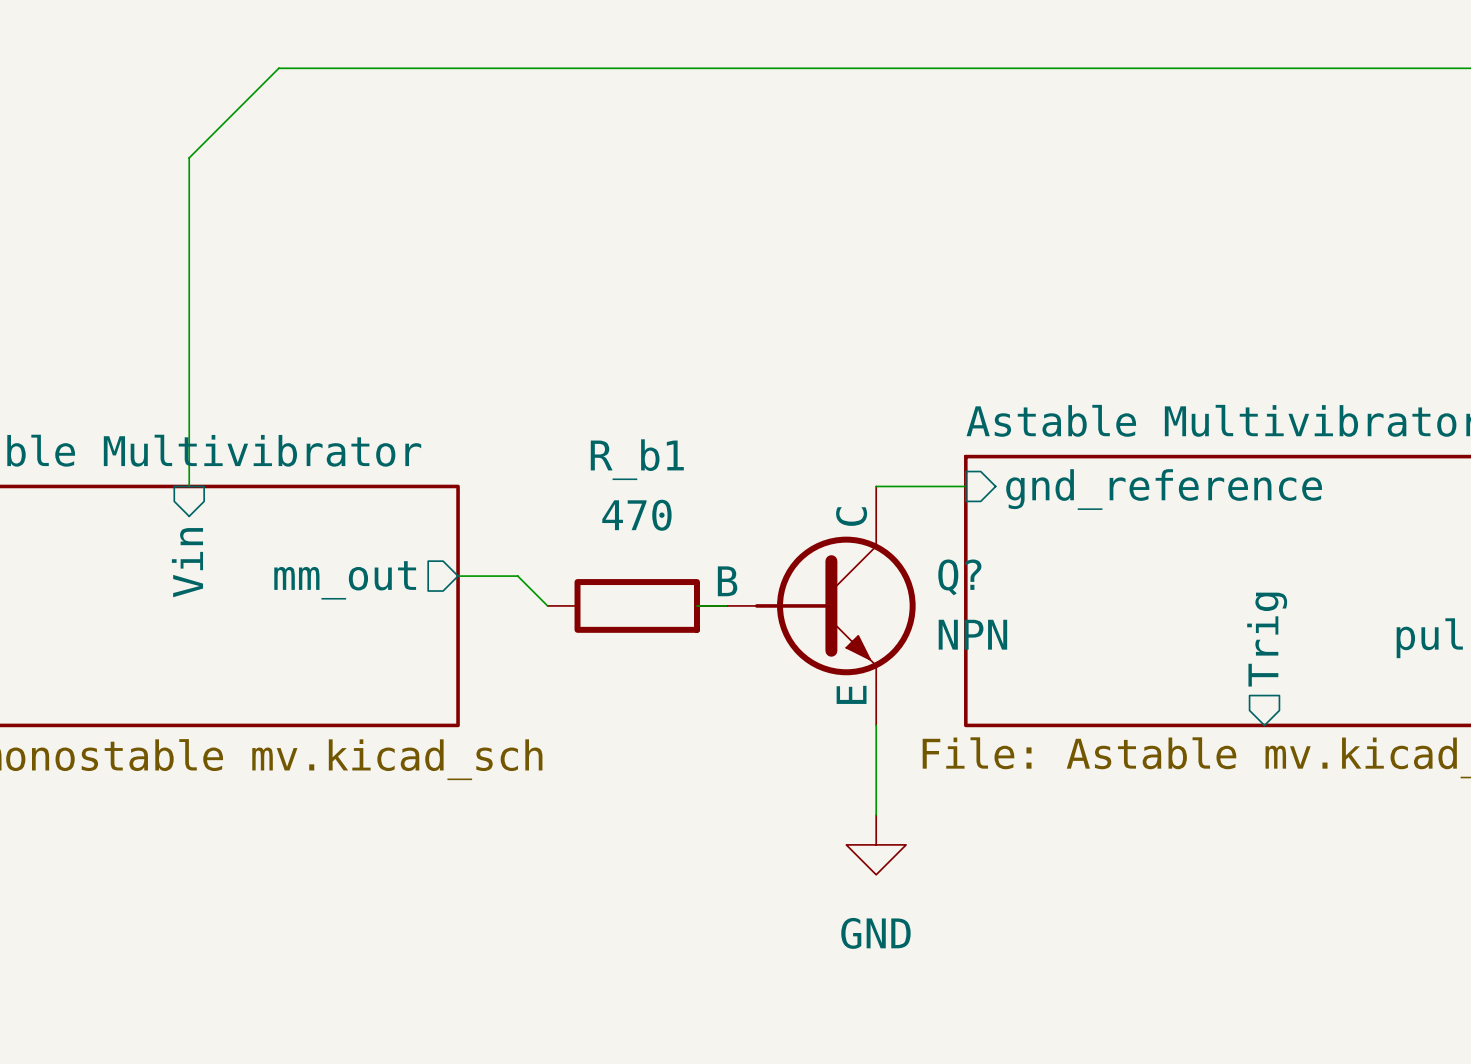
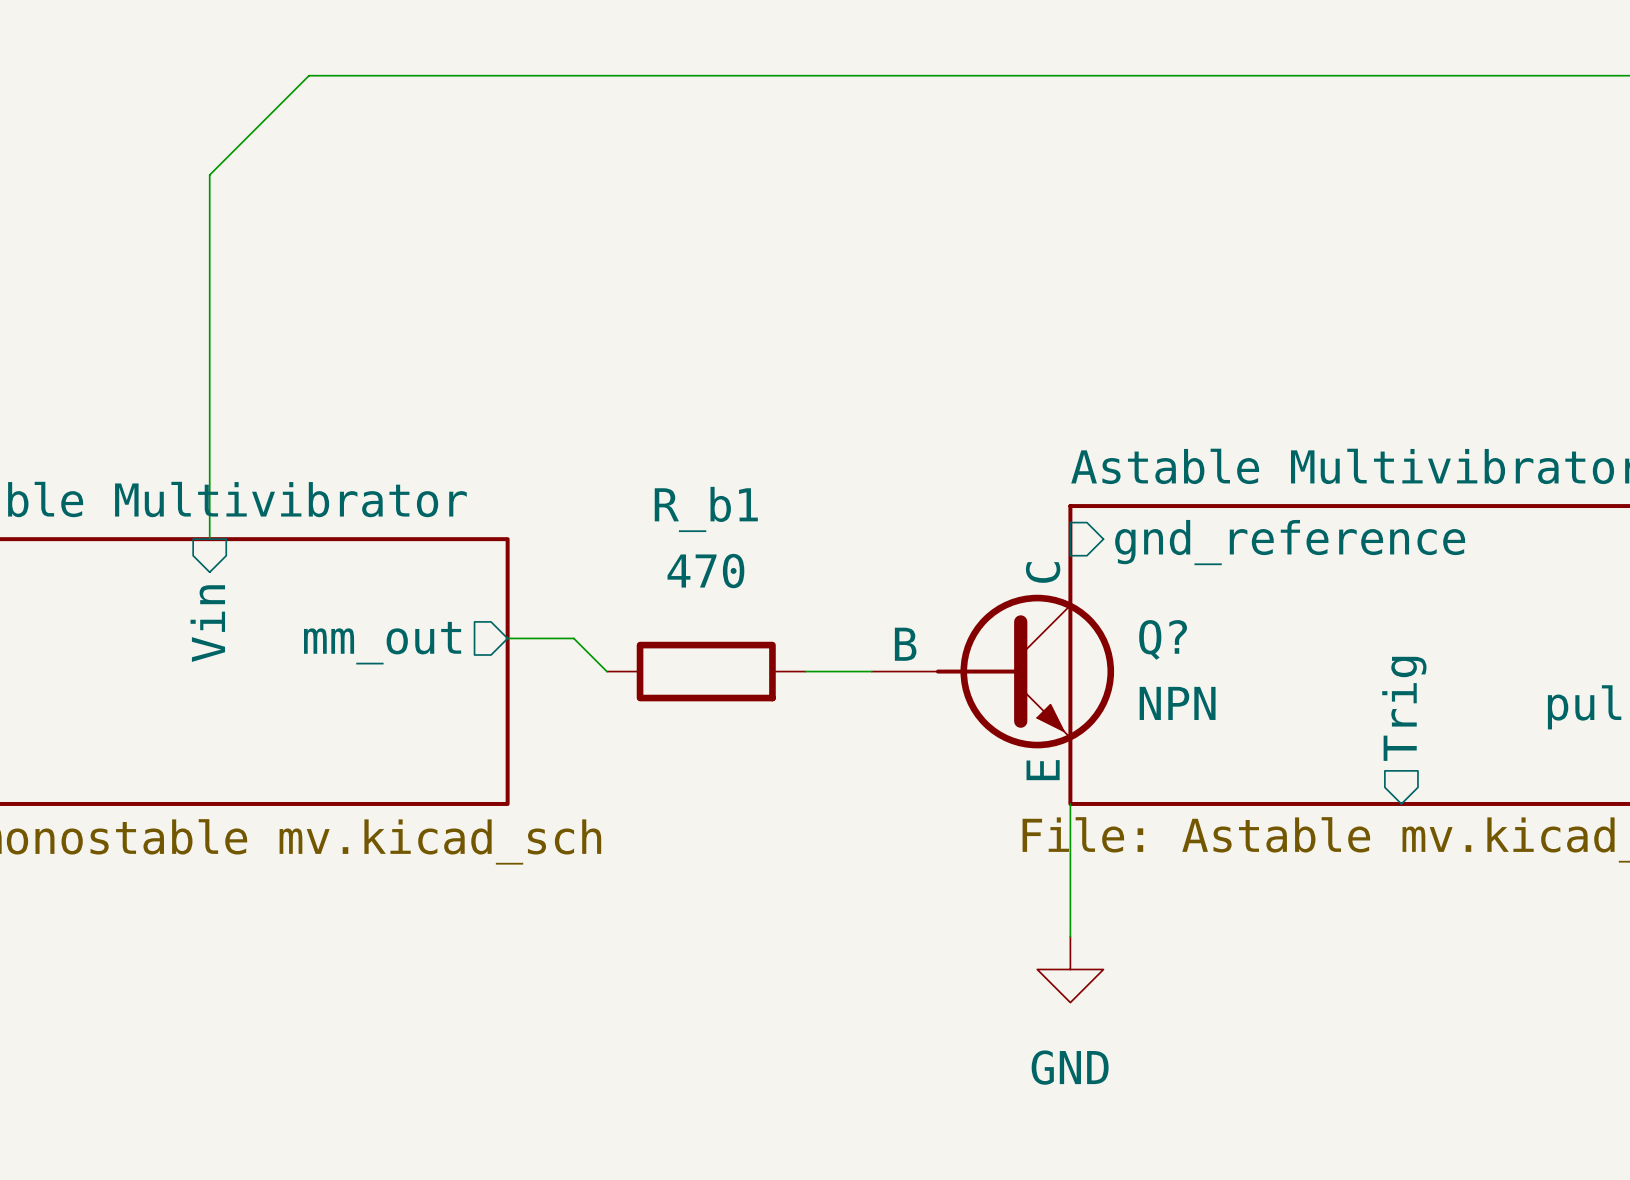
wire: (876, 486) (965, 486) -> none
Q? position: (806, 605) -> (992, 671)
wire: (876, 725) (876, 815) -> none
wire: none -> (1070, 803) (1070, 936)
power symbol position: GND (876, 844) -> GND (1070, 969)

